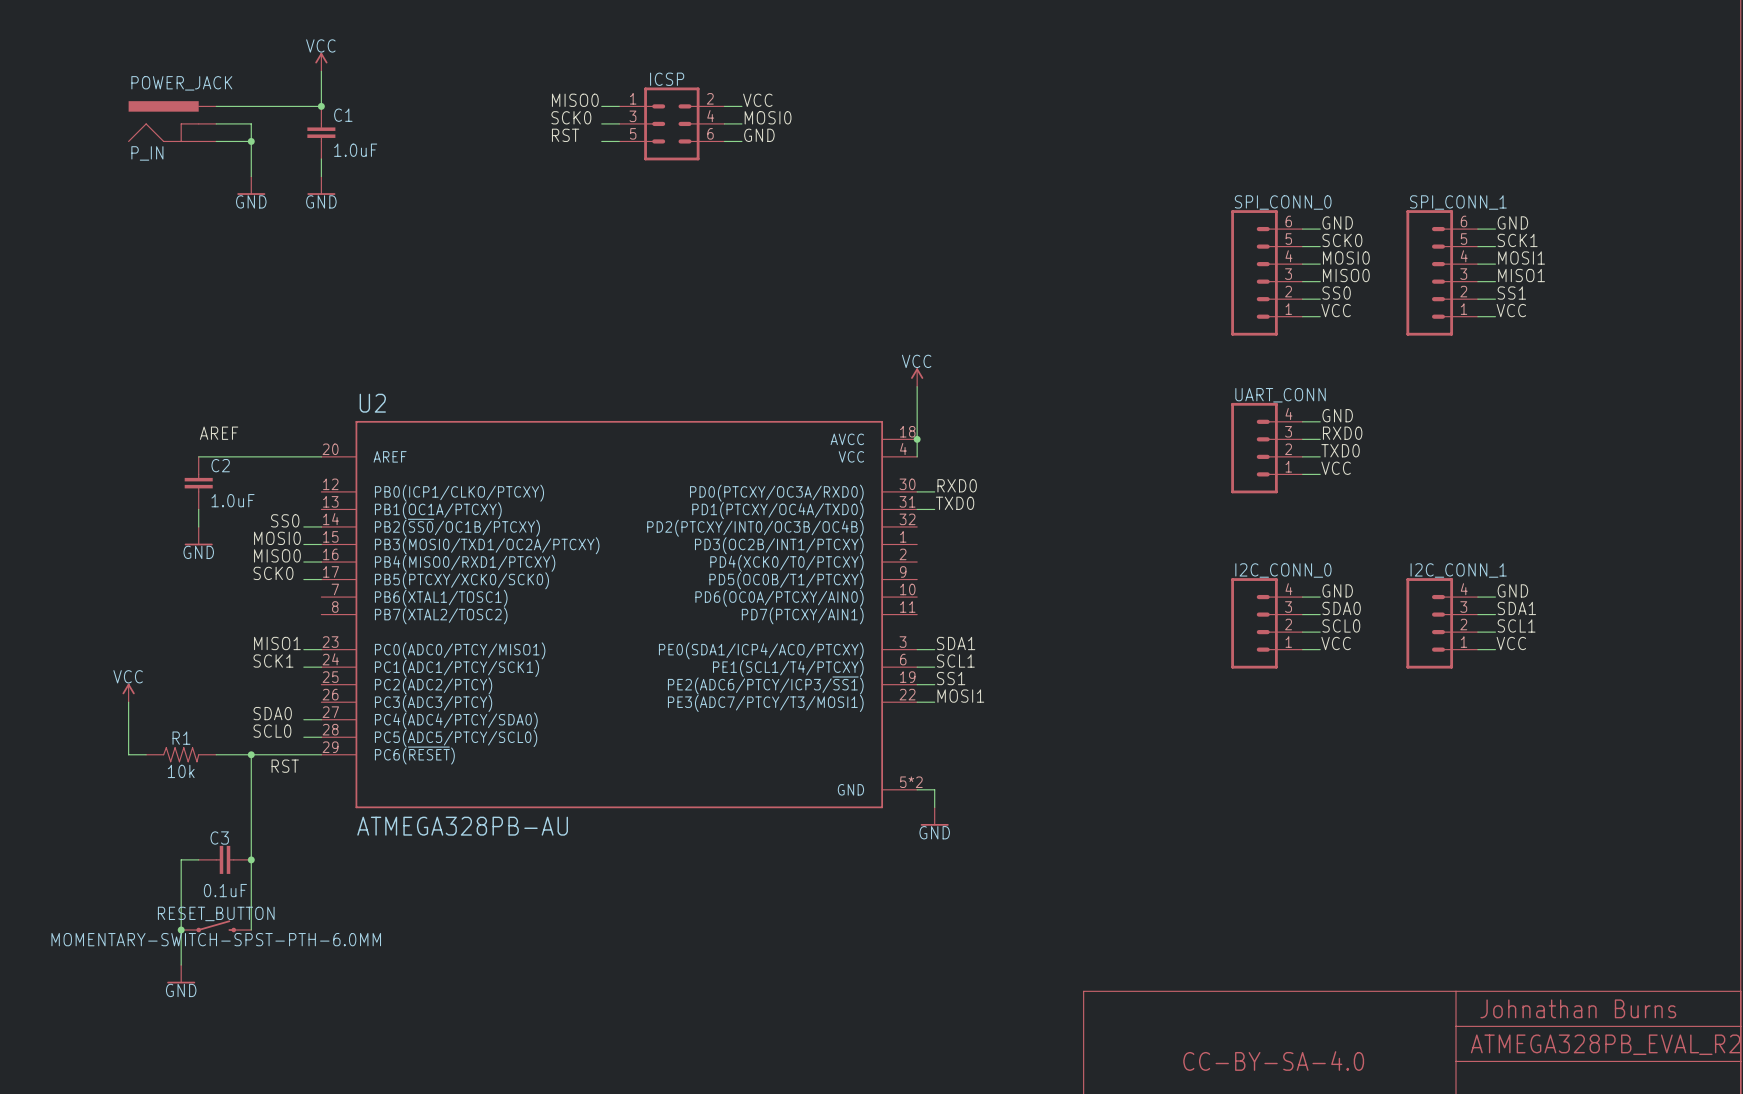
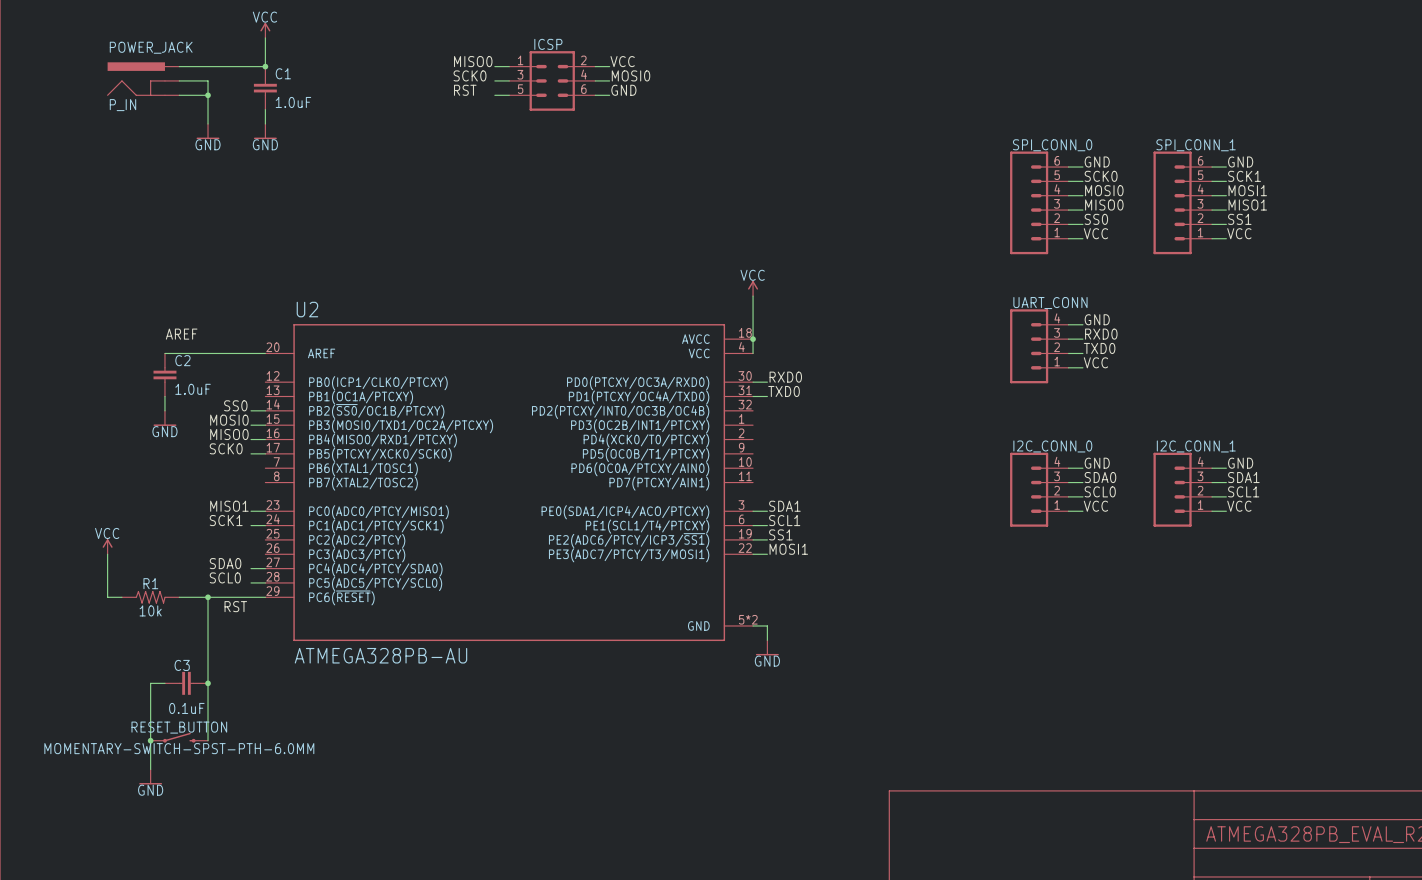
text: Johnathan Burns (1578, 1008) -> none
text: CC-BY-SA-4.0 (1273, 1061) -> none

